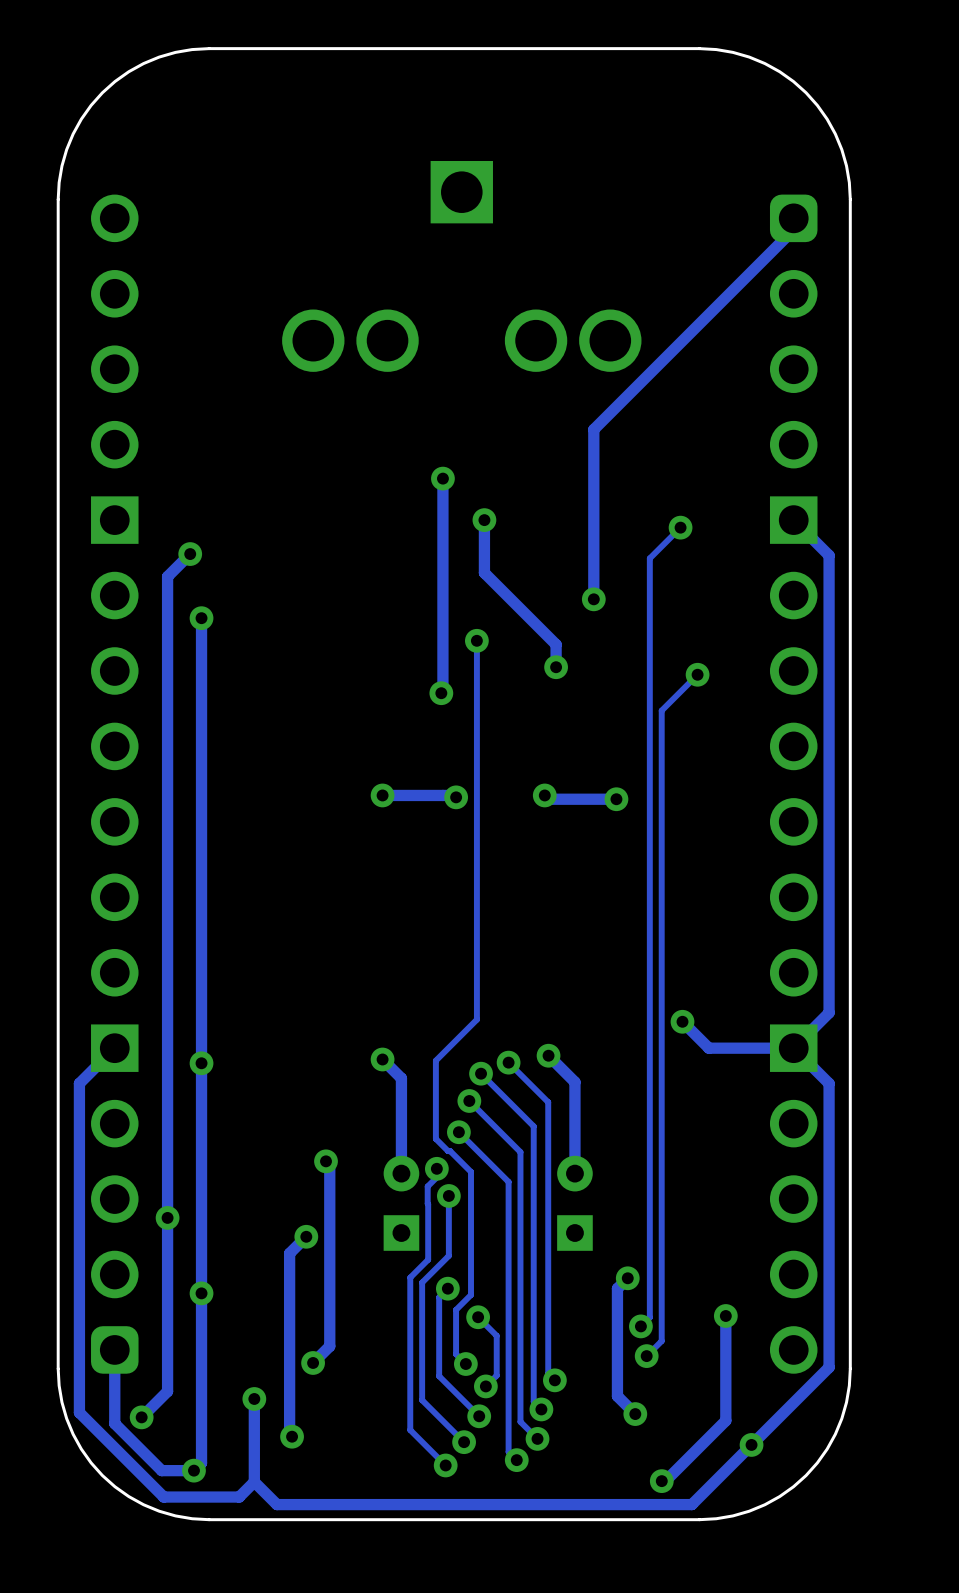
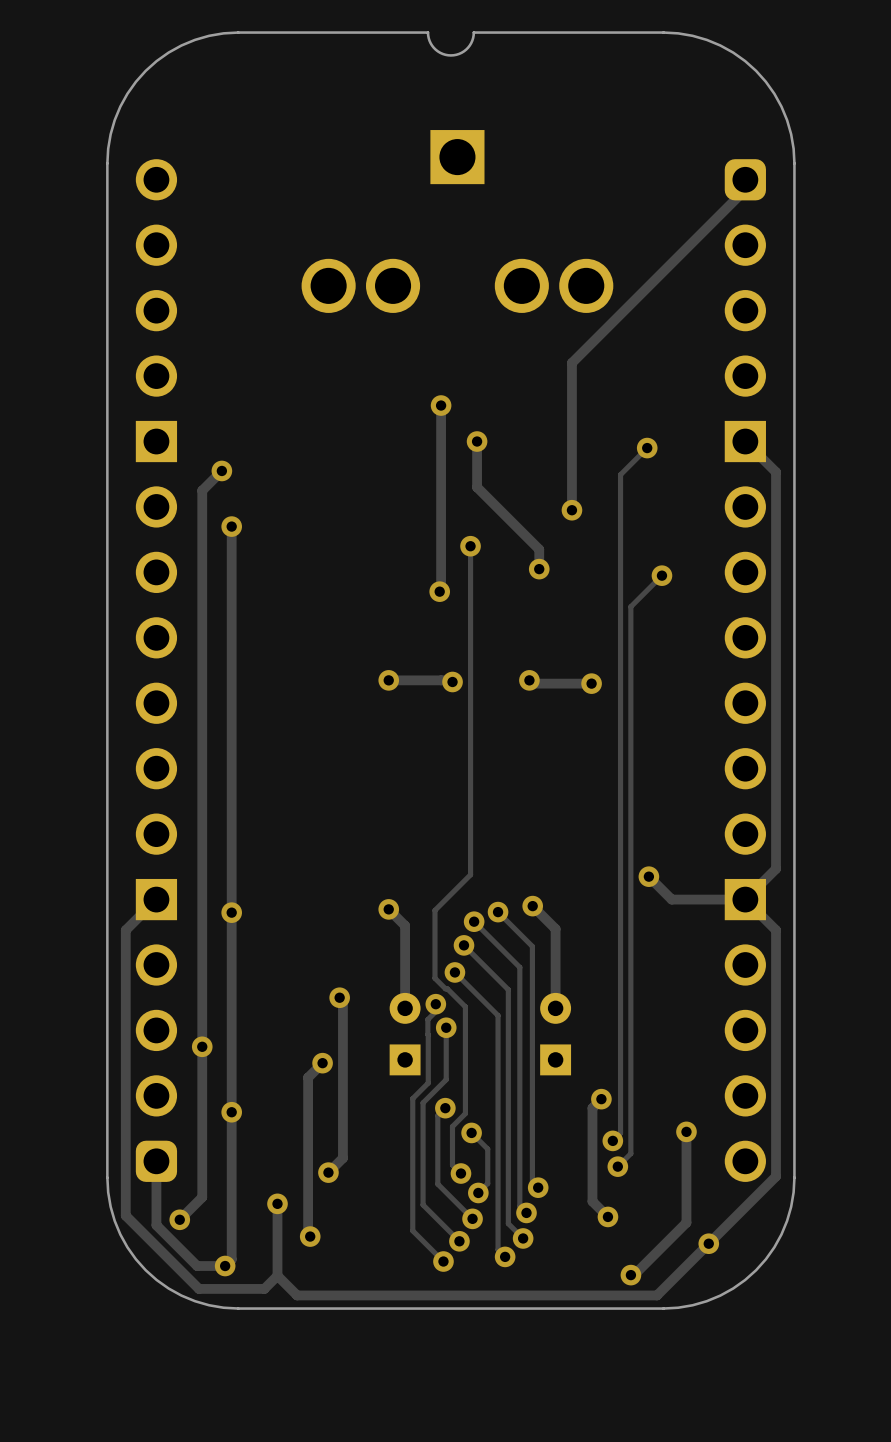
part footprint: [56, 47, 852, 1522] -> [106, 31, 796, 1310]

